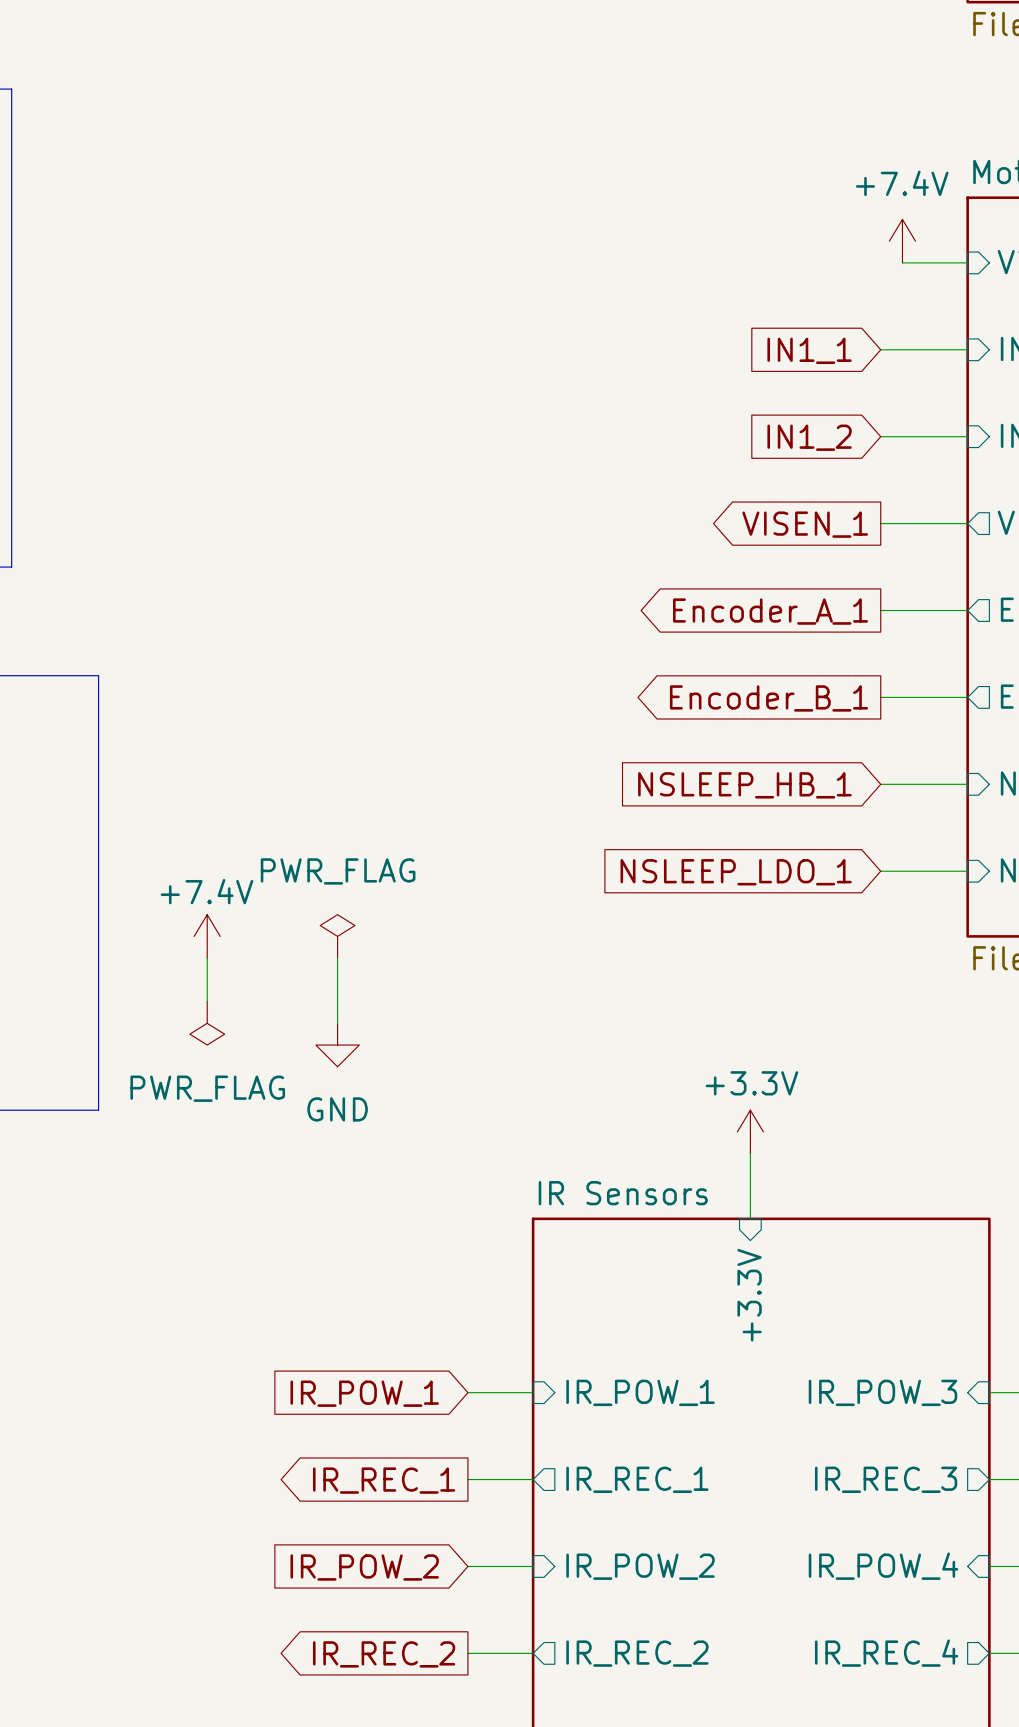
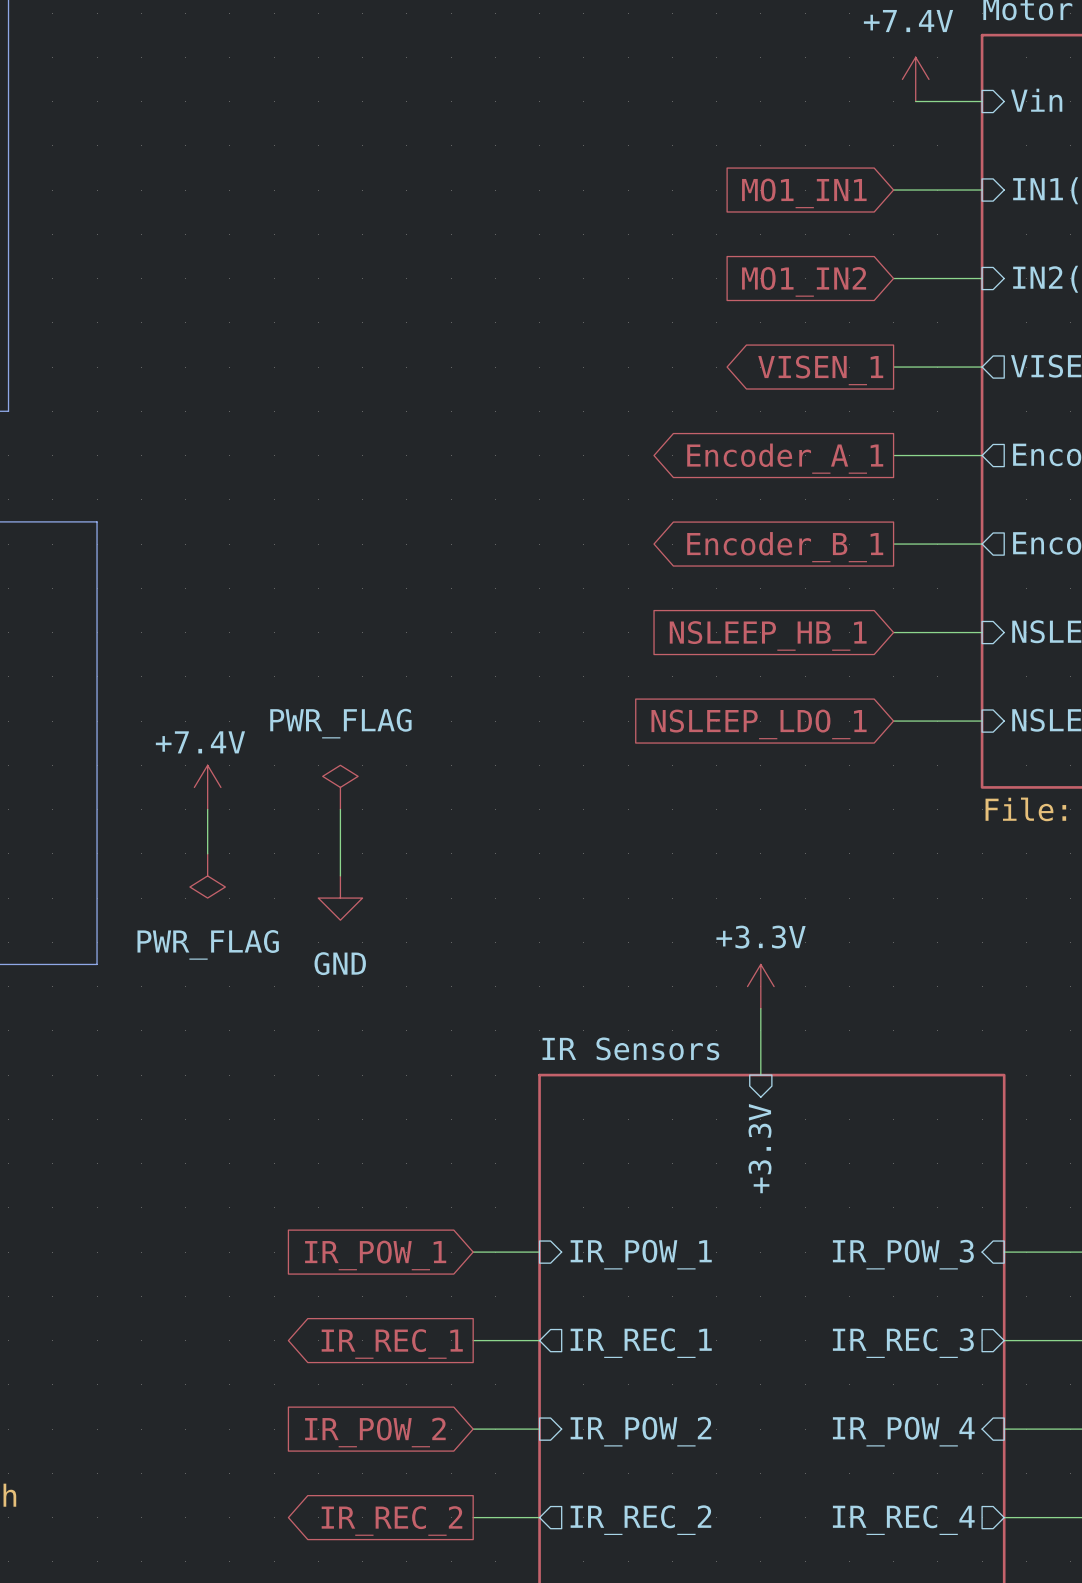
global label: IN1_1 (809, 350) -> MO1_IN1 (804, 193)
global label: IN1_2 (809, 437) -> MO1_IN2 (804, 281)

